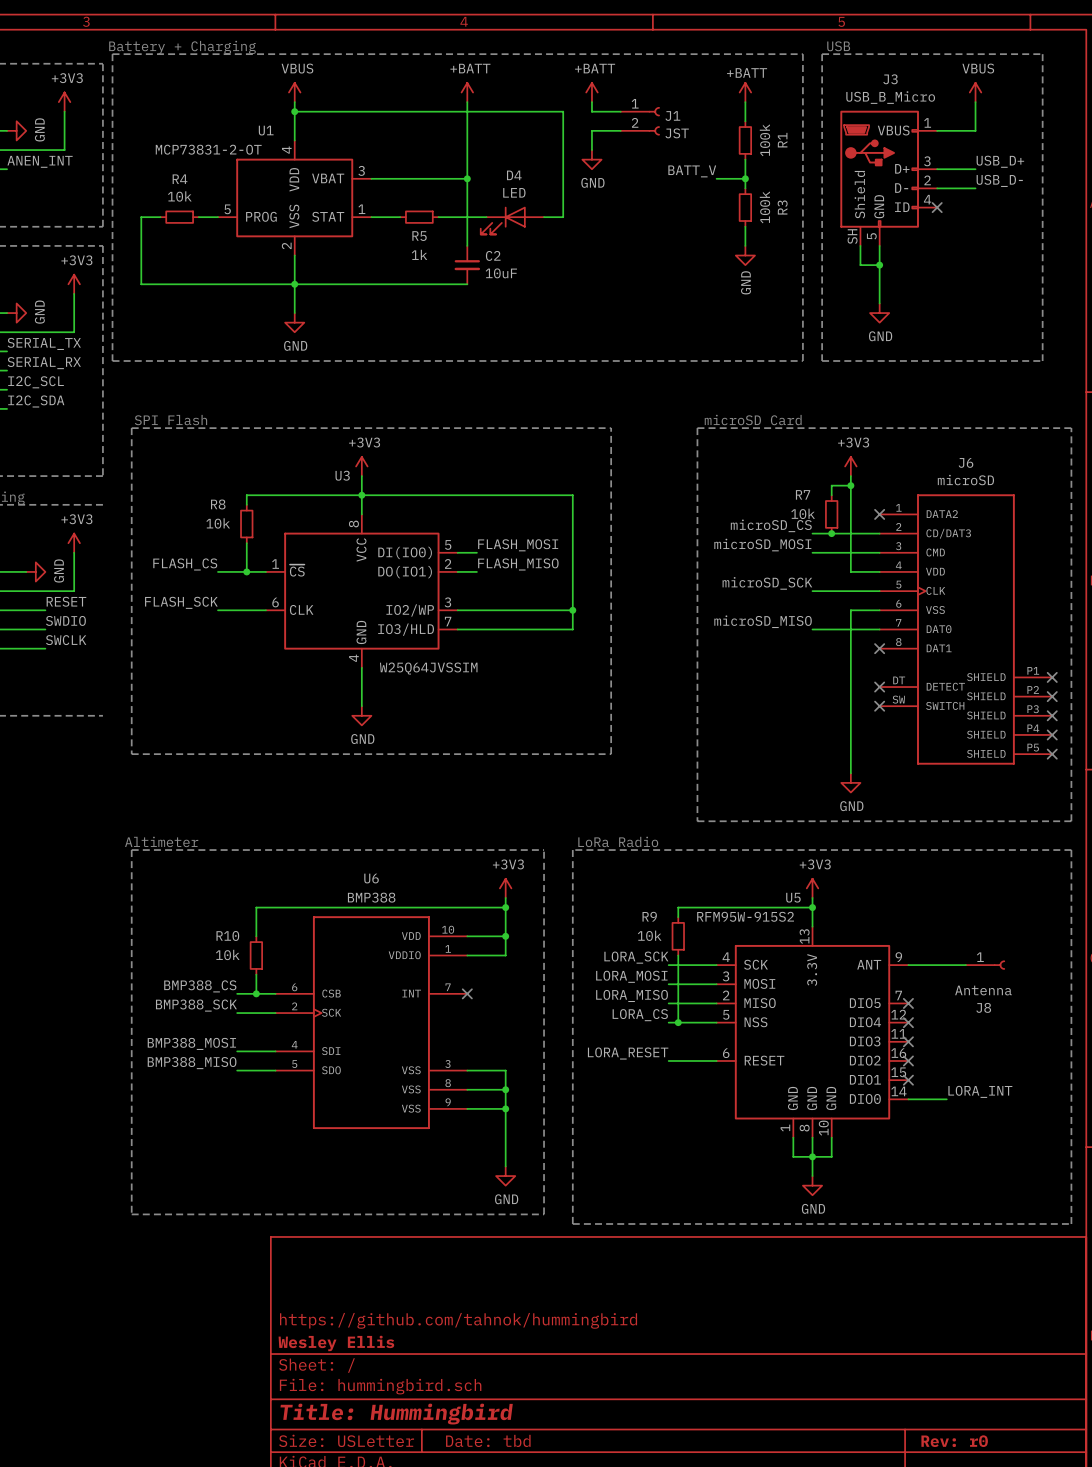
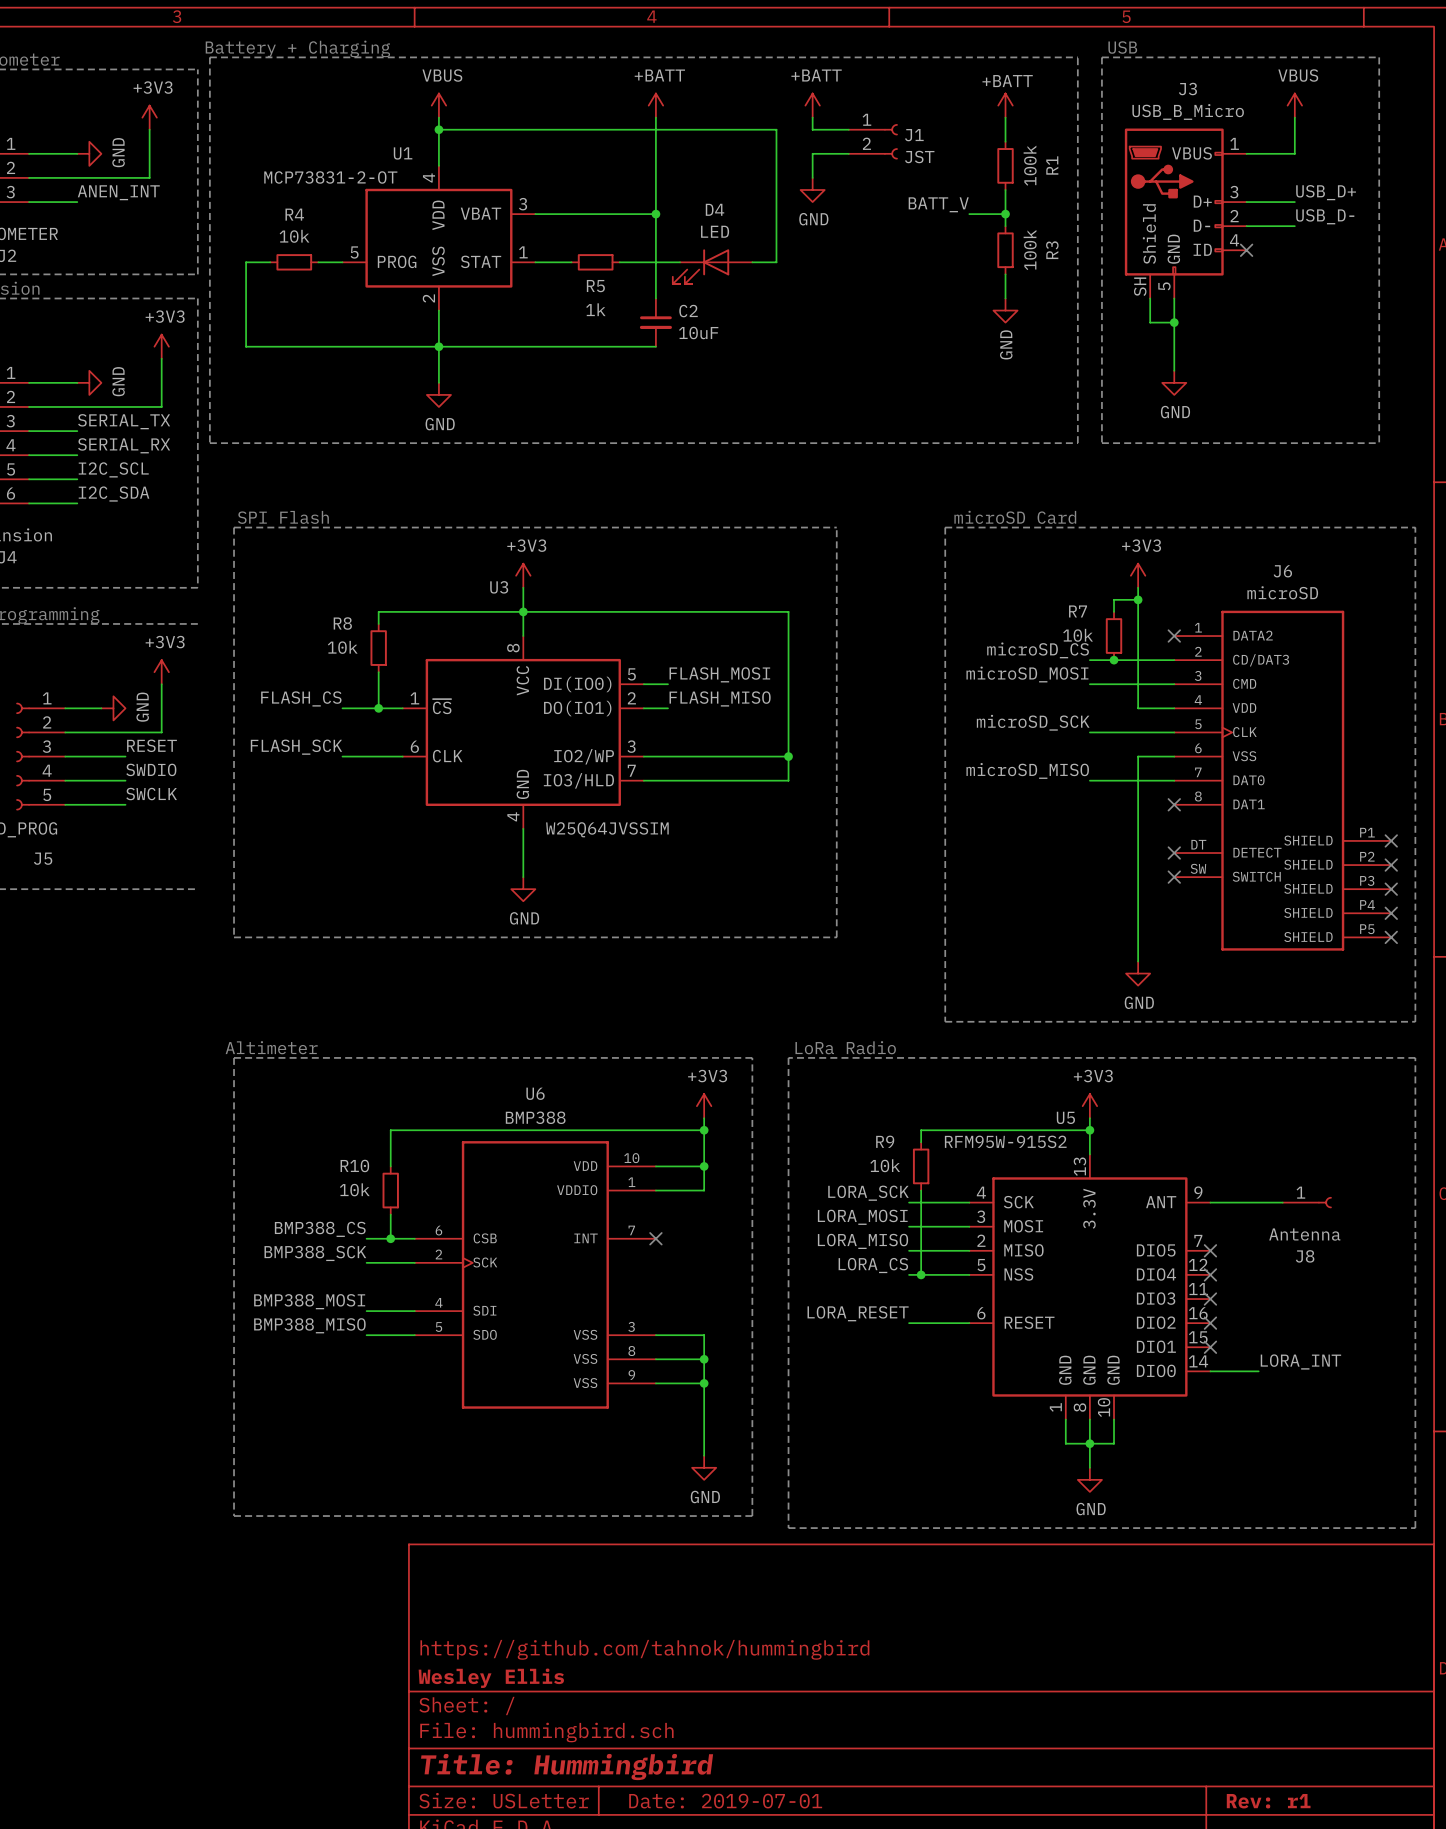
title block: Date: tbd (488, 1440) -> Date: 2019-07-01 (725, 1801)
title block: Rev: r0 (954, 1441) -> Rev: r1 (1268, 1801)

